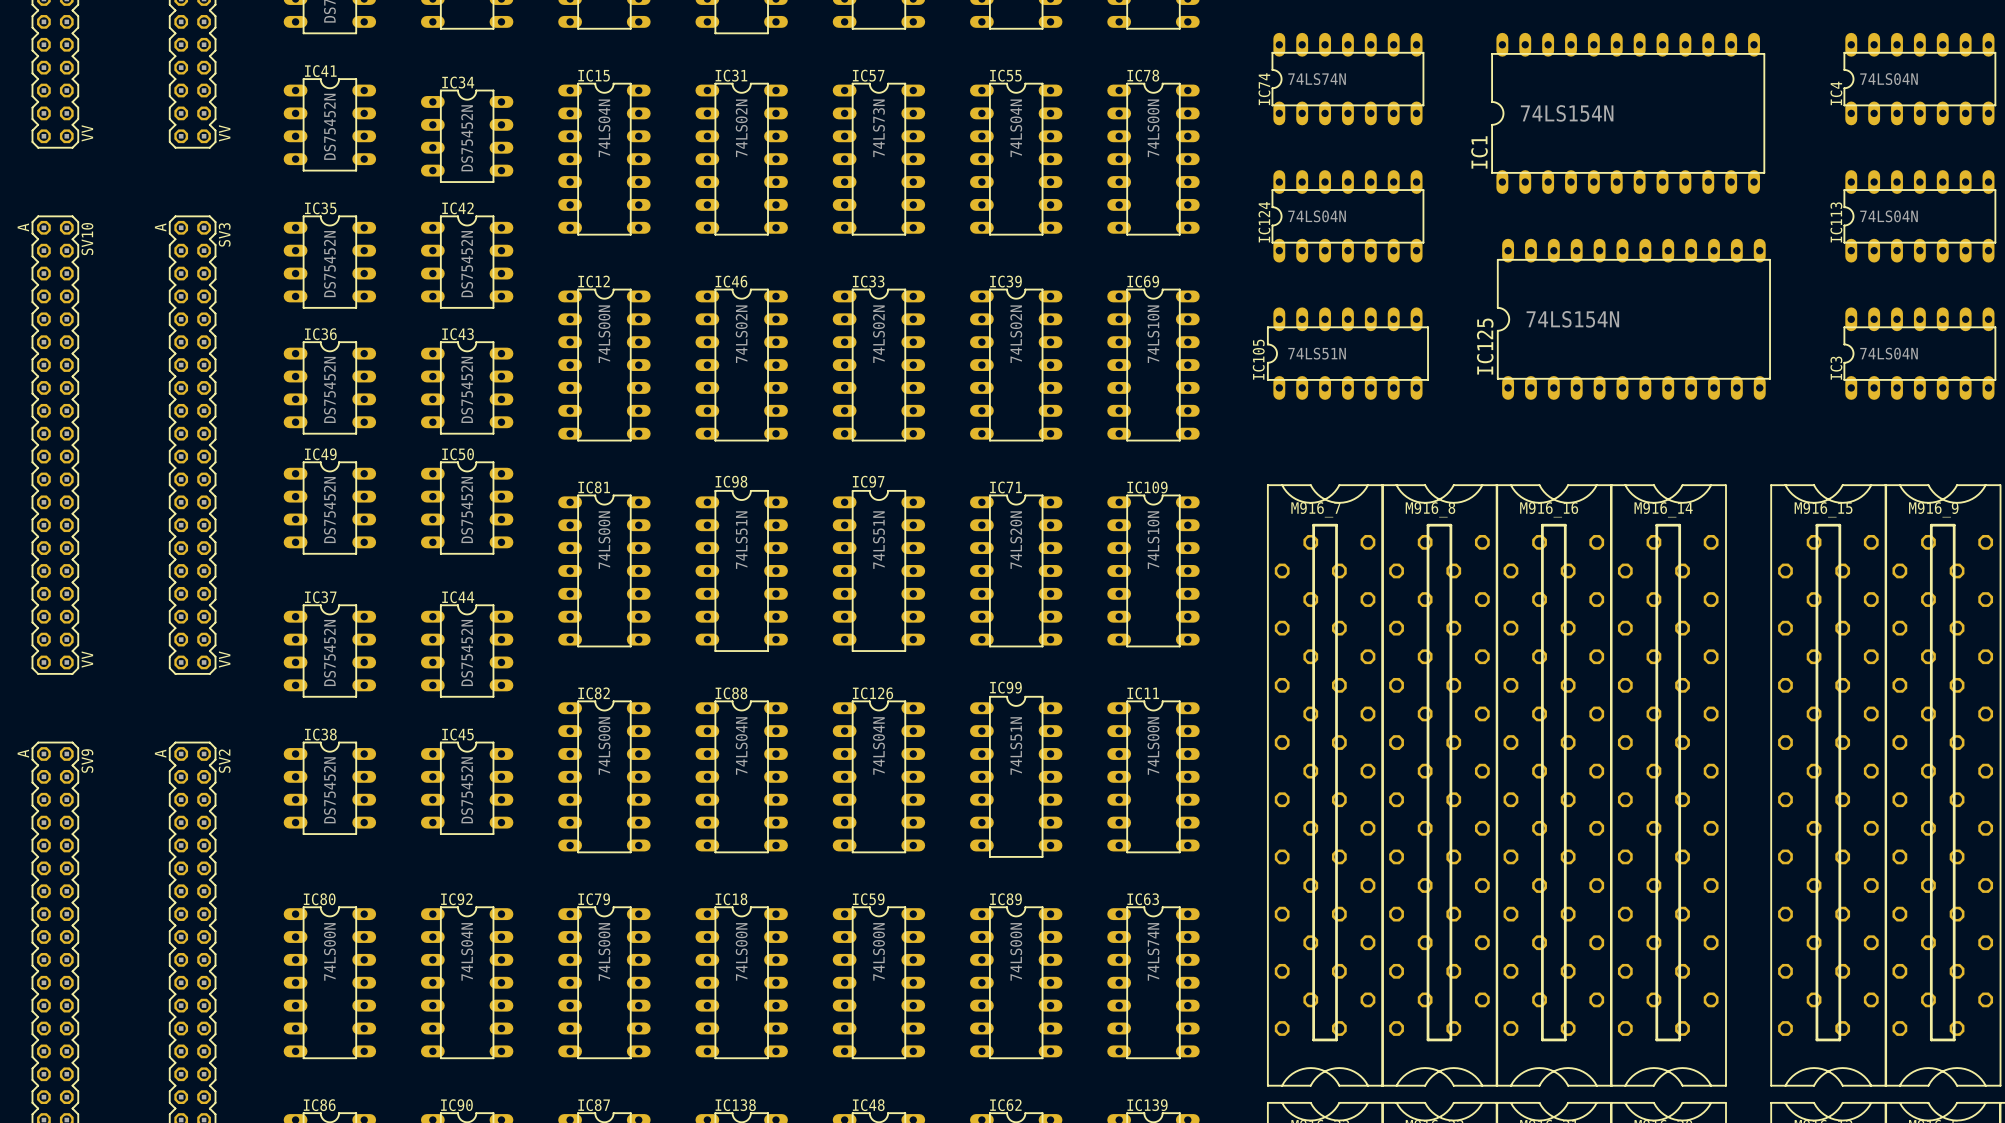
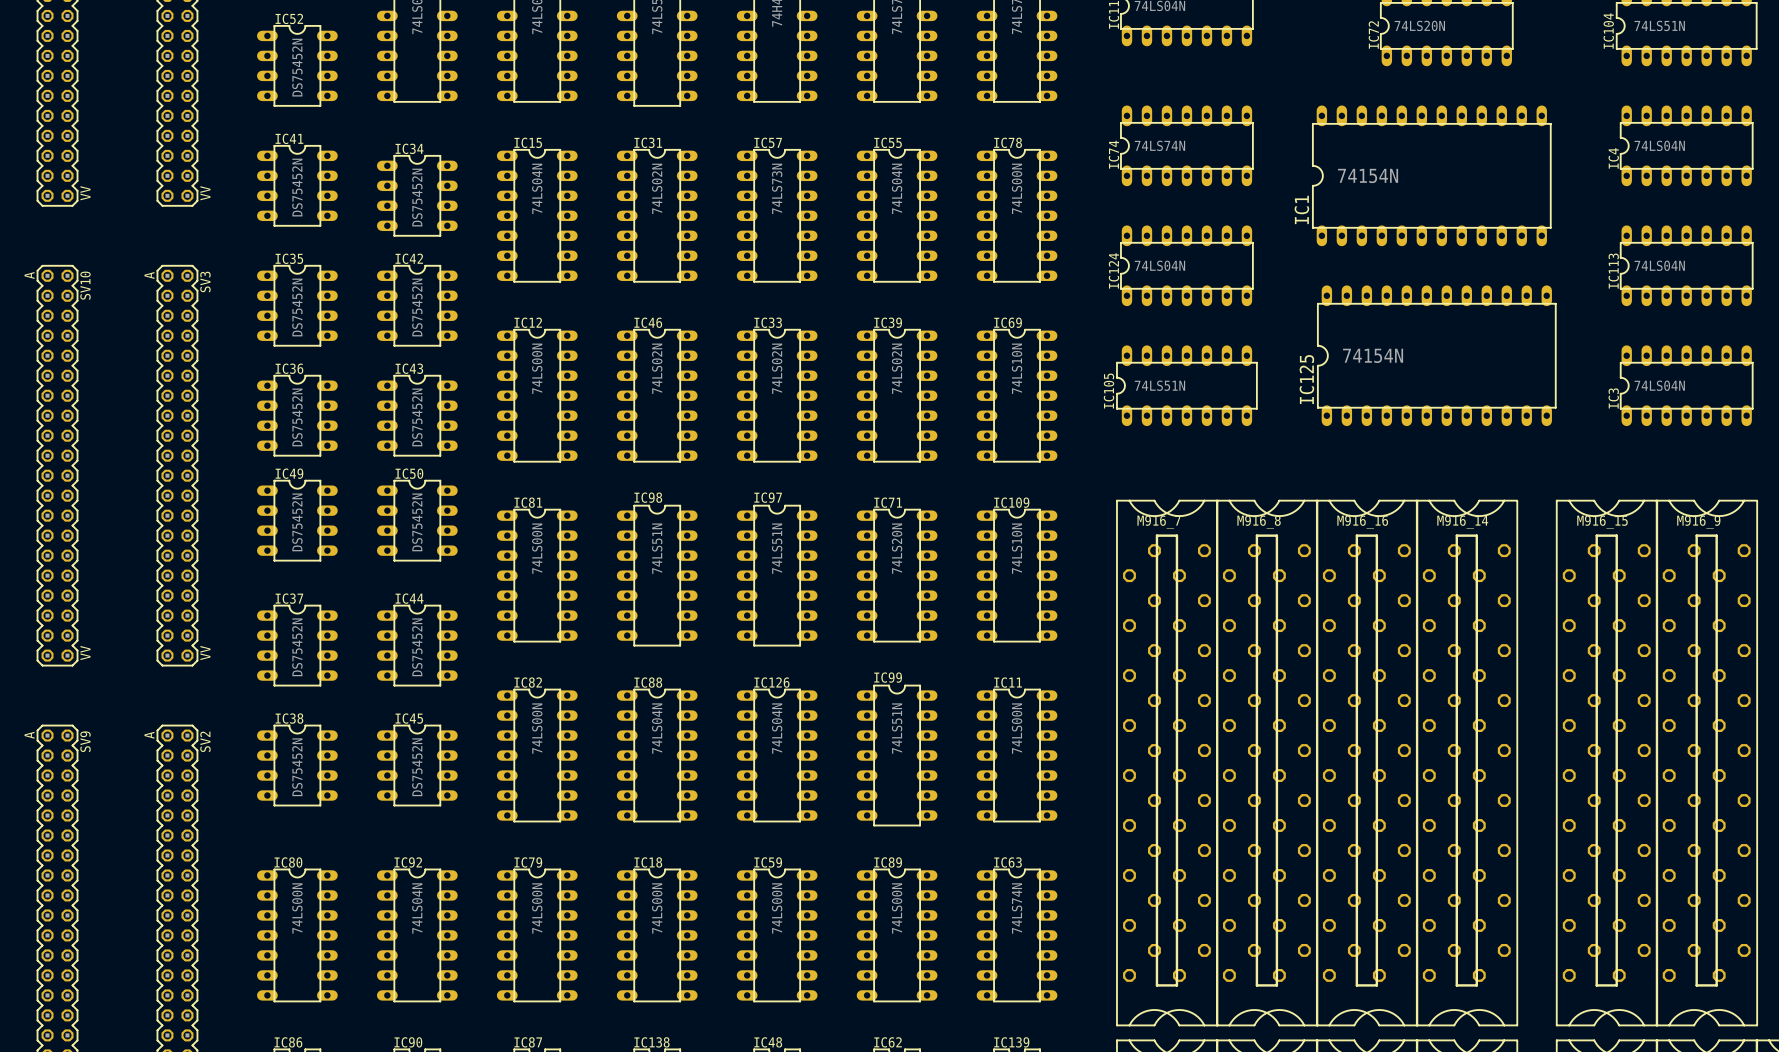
IC1 value: 74LS154N (1567, 113) -> 74154N (1368, 175)
IC125 value: 74LS154N (1572, 319) -> 74154N (1373, 355)

